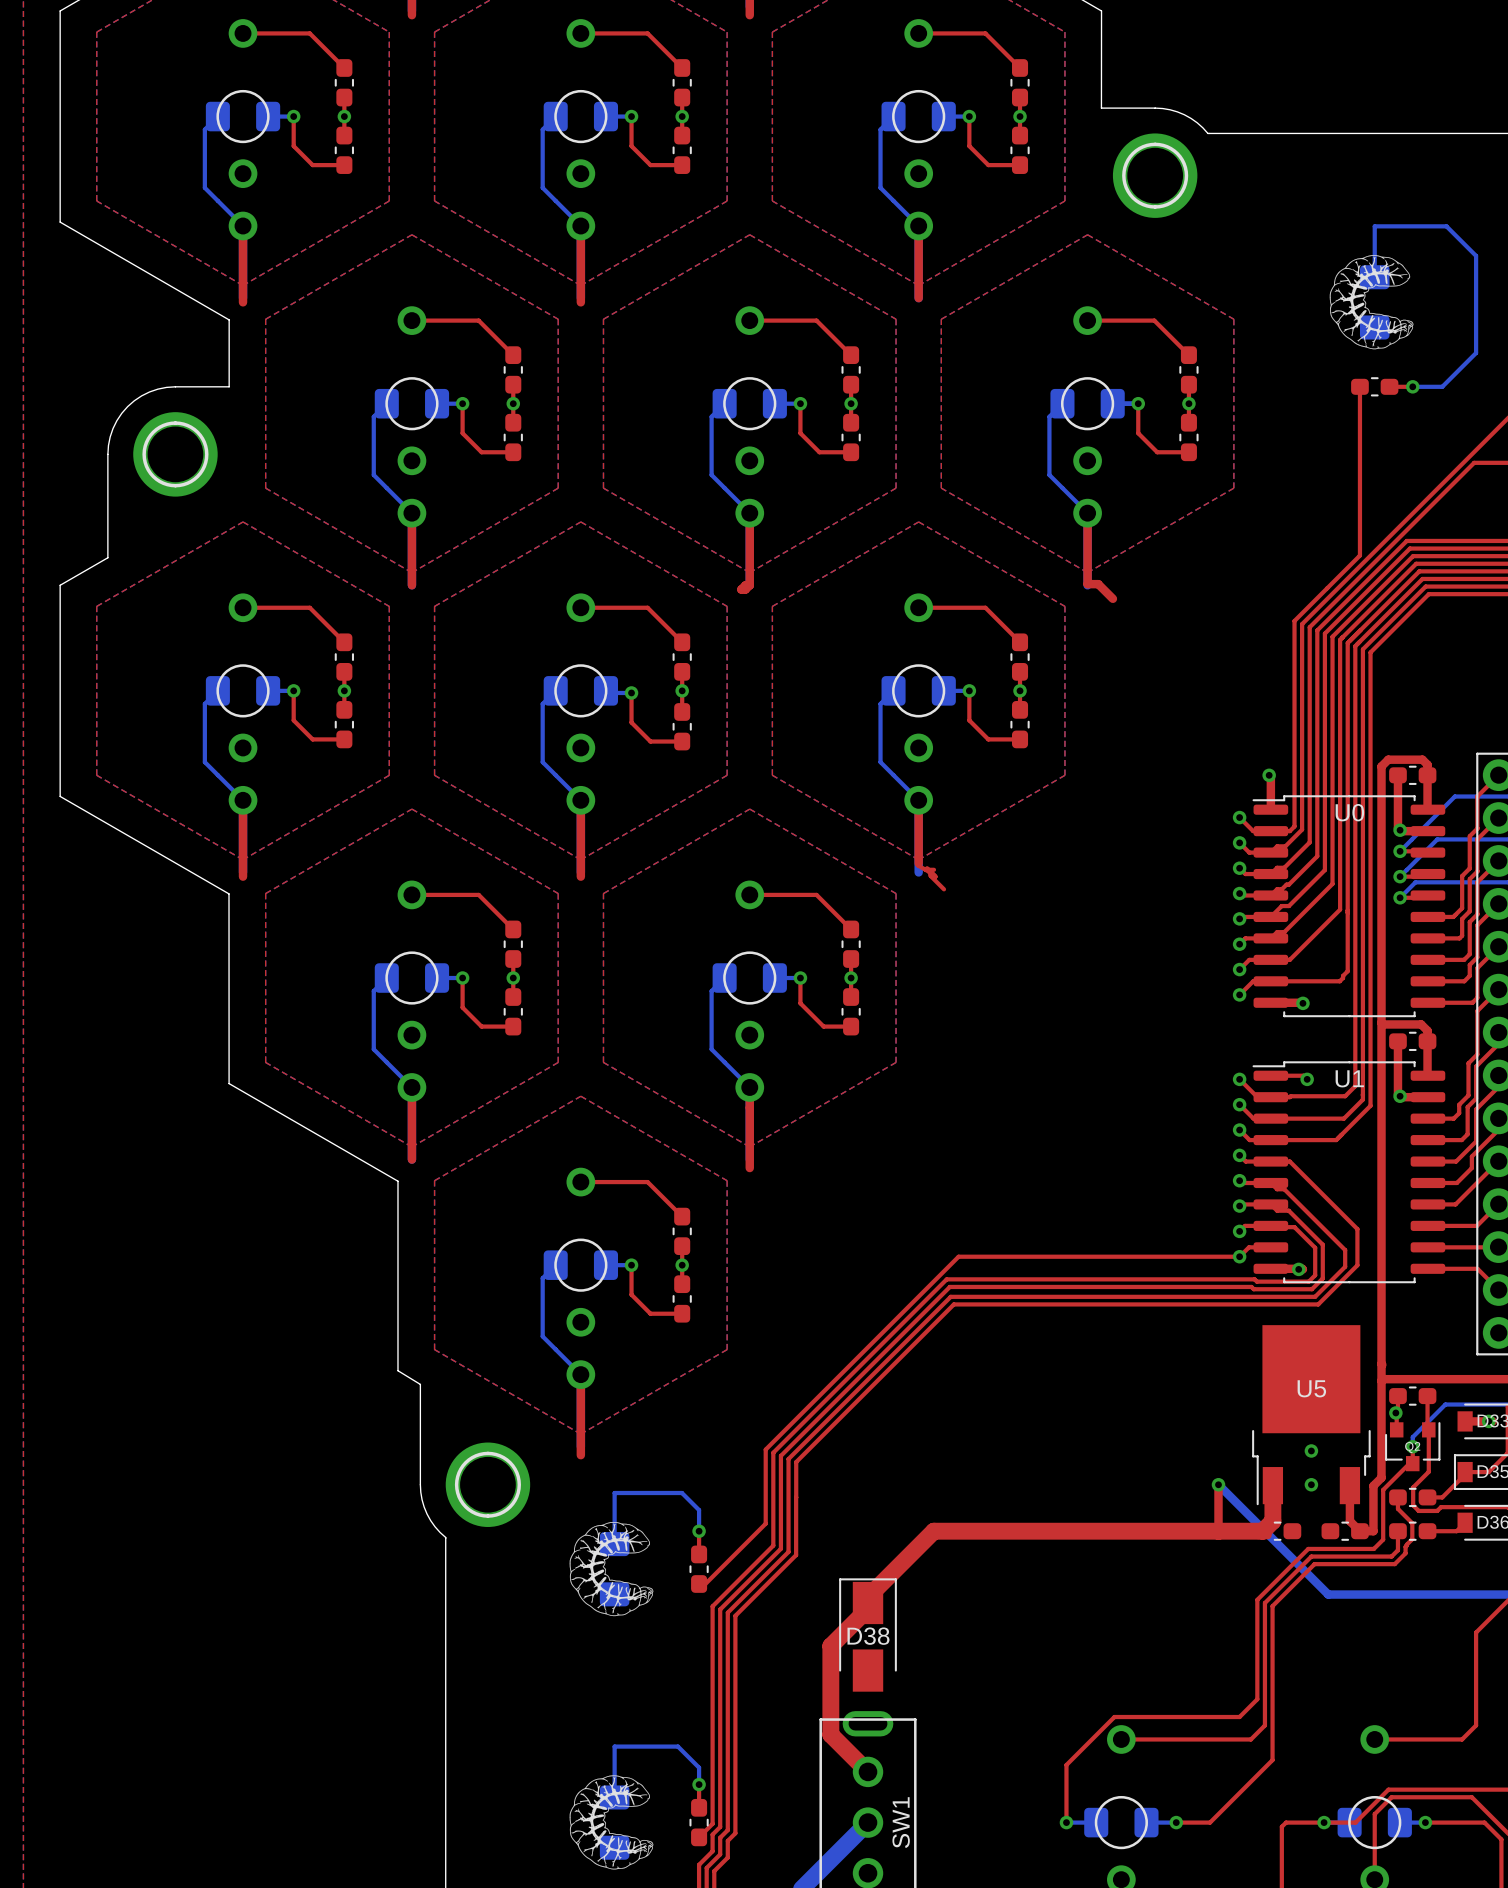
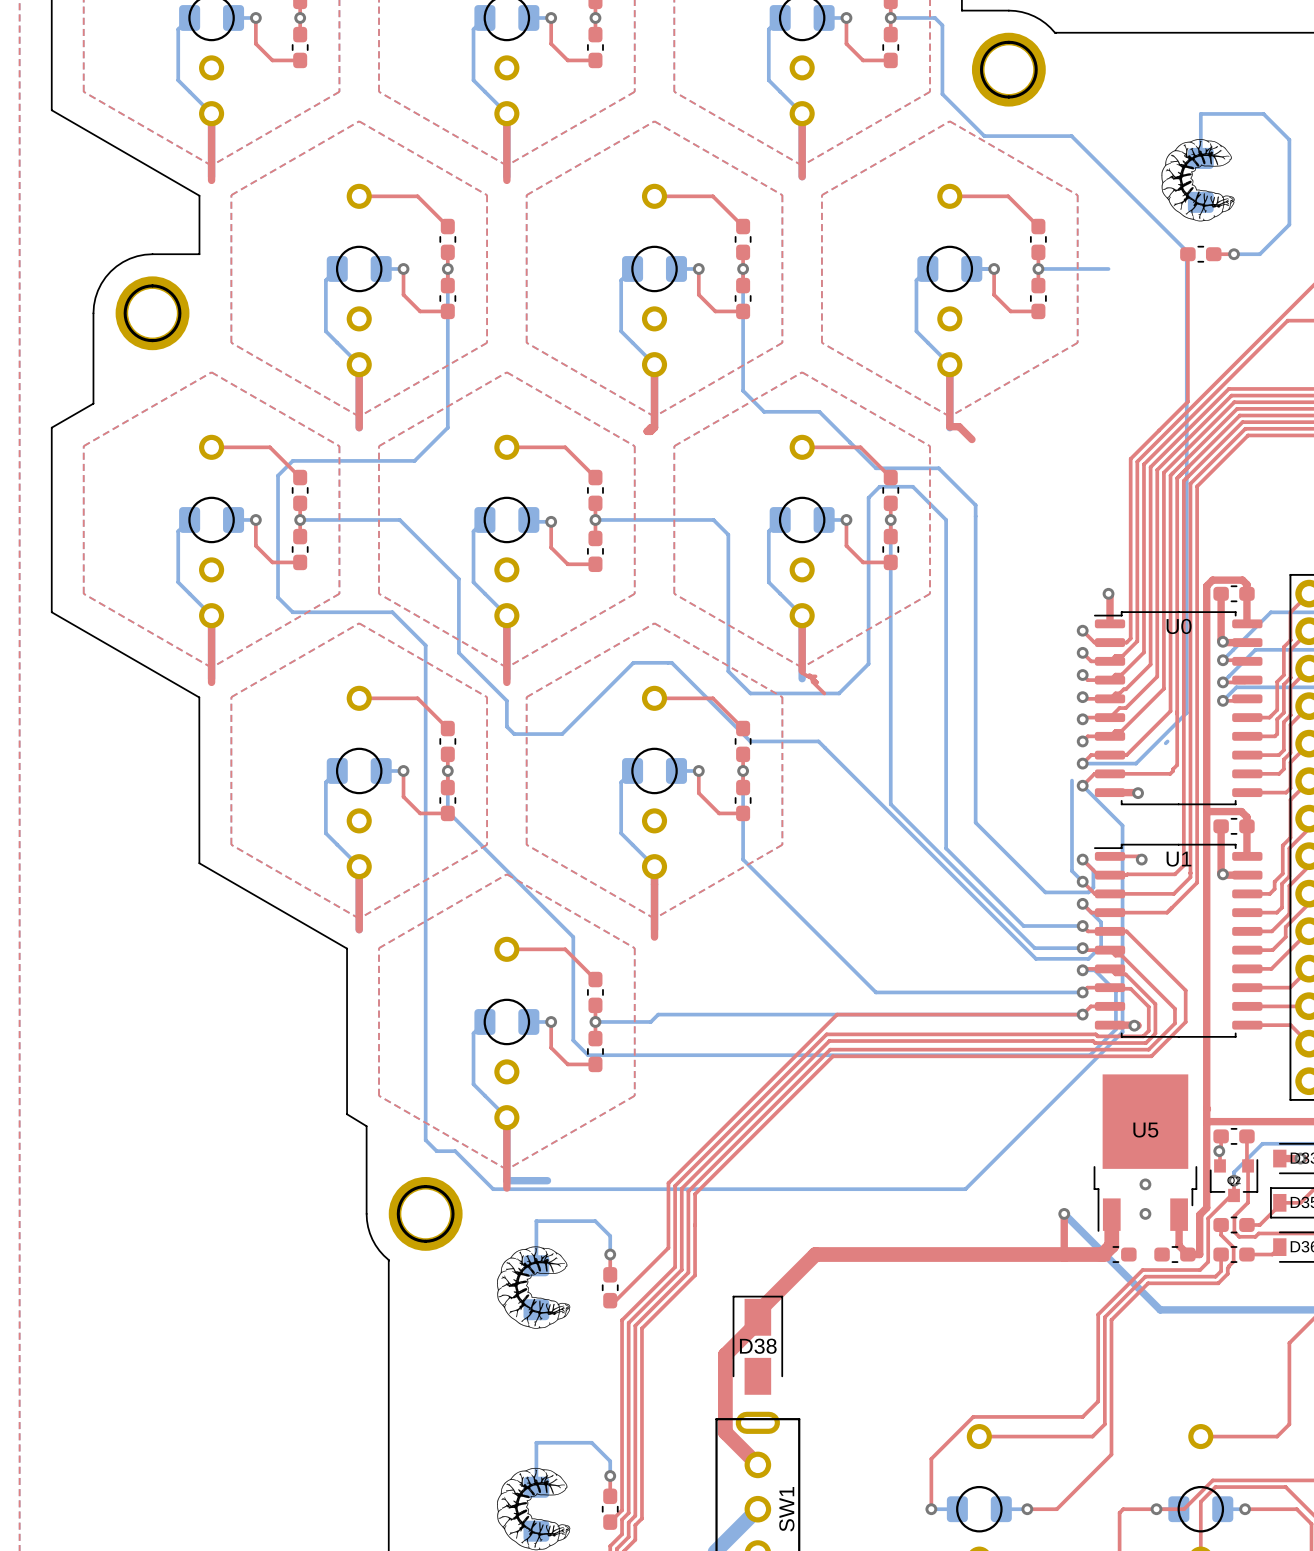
bottom track: none -> (890, 17) (935, 17) (942, 25) (942, 94) (984, 136) (1071, 136) (1186, 251) (1186, 712) (1136, 763) (1082, 763)
bottom track: none -> (447, 268) (447, 427) (414, 460) (292, 460) (278, 475) (278, 597) (292, 612) (392, 612) (425, 645) (425, 1140) (436, 1151) (455, 1151) (493, 1189) (965, 1189) (1122, 1032) (1122, 825) (1082, 785)
bottom track: none -> (743, 268) (743, 390) (764, 411) (819, 411) (875, 468) (938, 468) (975, 505) (975, 822) (1045, 892) (1088, 892) (1093, 887) (1093, 870) (1082, 859)
bottom track: none -> (1038, 268) (1108, 268)
bottom track: none -> (300, 519) (399, 519) (458, 579) (458, 652) (506, 700) (506, 726) (514, 734) (562, 734) (633, 662) (671, 662) (750, 741) (818, 741) (1036, 958) (1088, 958) (1101, 946) (1101, 922) (1082, 903)
bottom track: none -> (595, 519) (713, 519) (728, 534) (728, 671) (750, 693) (839, 693) (868, 663) (868, 497) (879, 486) (912, 486) (946, 519) (946, 848) (1023, 926) (1082, 926)
bottom track: none -> (890, 519) (890, 804) (1034, 948) (1082, 948)
bottom track: none -> (1167, 741) (1165, 743)
bottom track: none -> (447, 770) (447, 811) (573, 937) (573, 1040) (588, 1055) (1090, 1055) (1115, 1029) (1115, 991) (1094, 970) (1082, 970)
bottom track: none -> (743, 770) (743, 859) (875, 992) (1082, 992)
bottom track: none -> (1071, 780) (1071, 871) (1082, 881)
bottom track: none -> (1082, 1014) (658, 1014) (650, 1021) (595, 1021)
bottom track: none -> (506, 1180) (547, 1180)

